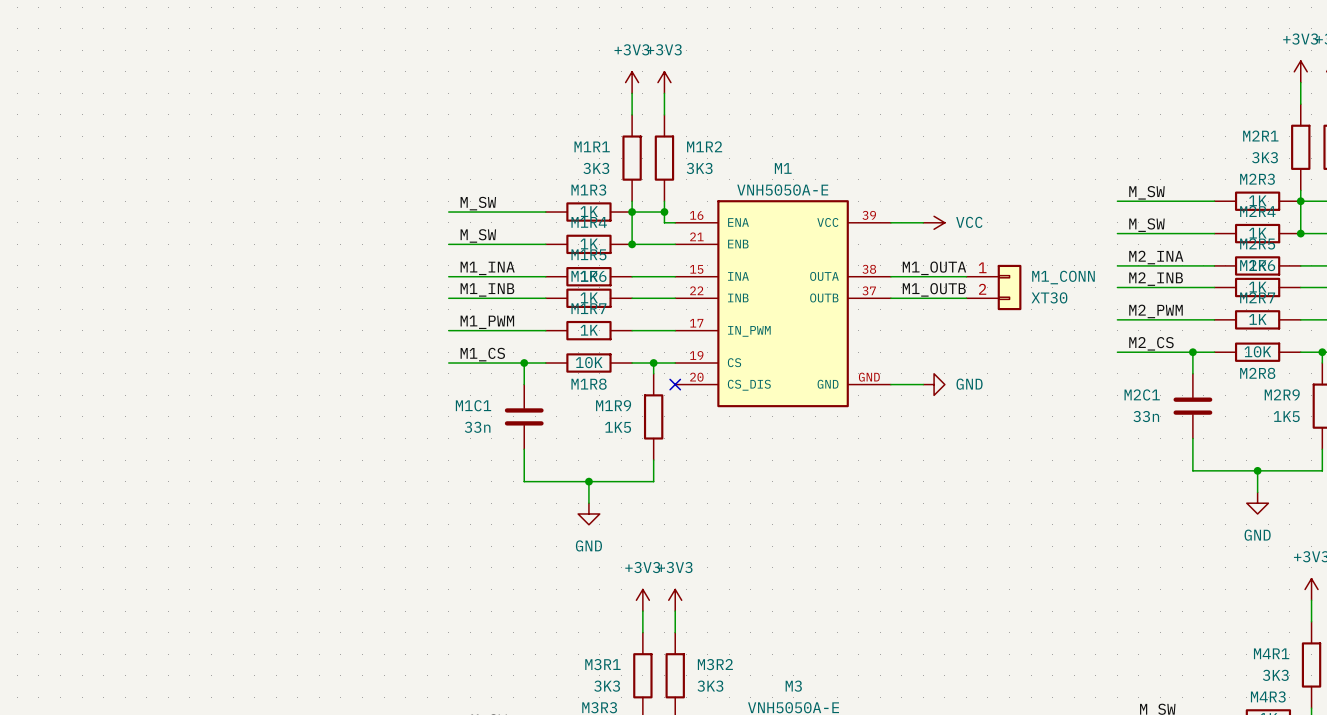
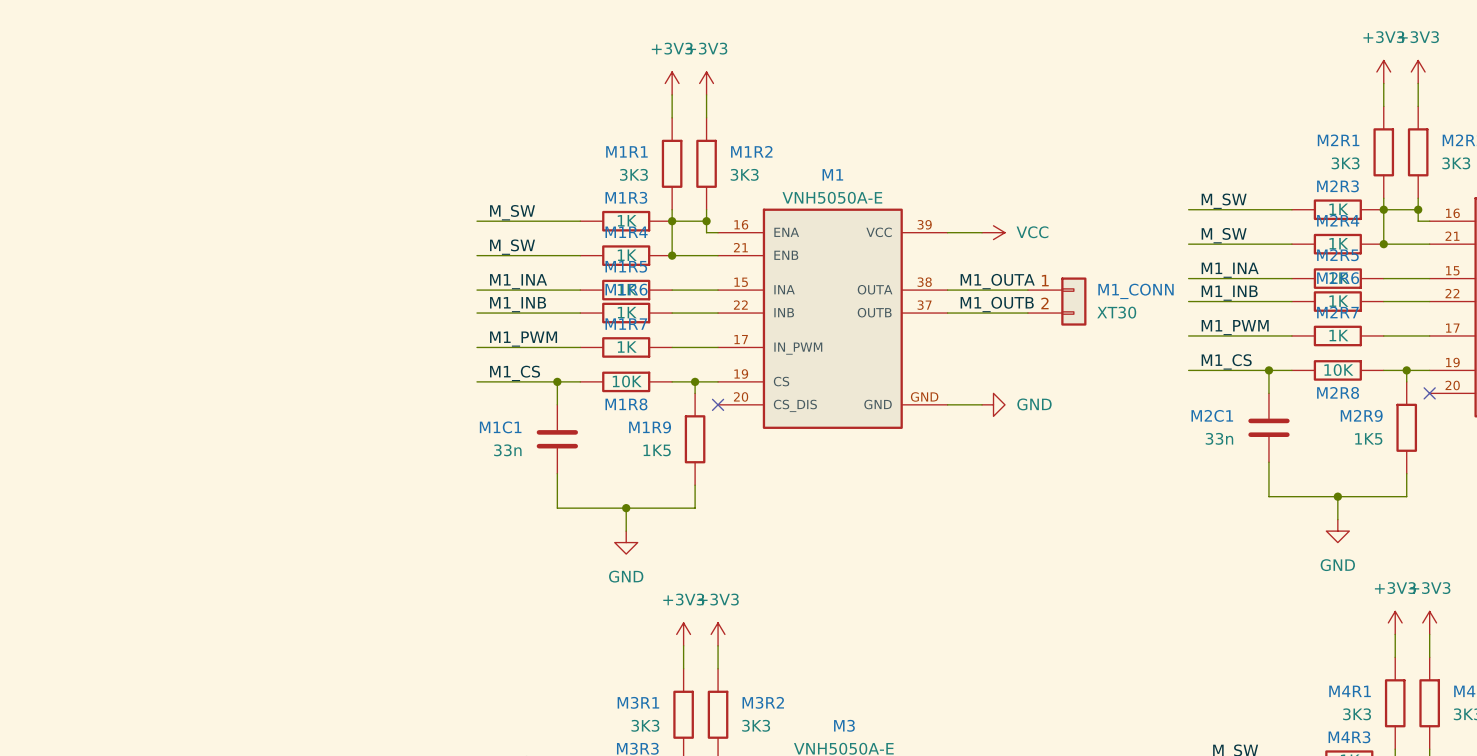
label: M2_INA (1156, 257) -> M1_INA (1230, 270)
label: M2_INB (1156, 279) -> M1_INB (1229, 293)
label: M2_PWM (1156, 311) -> M1_PWM (1235, 327)
label: M2_CS (1151, 343) -> M1_CS (1226, 361)

